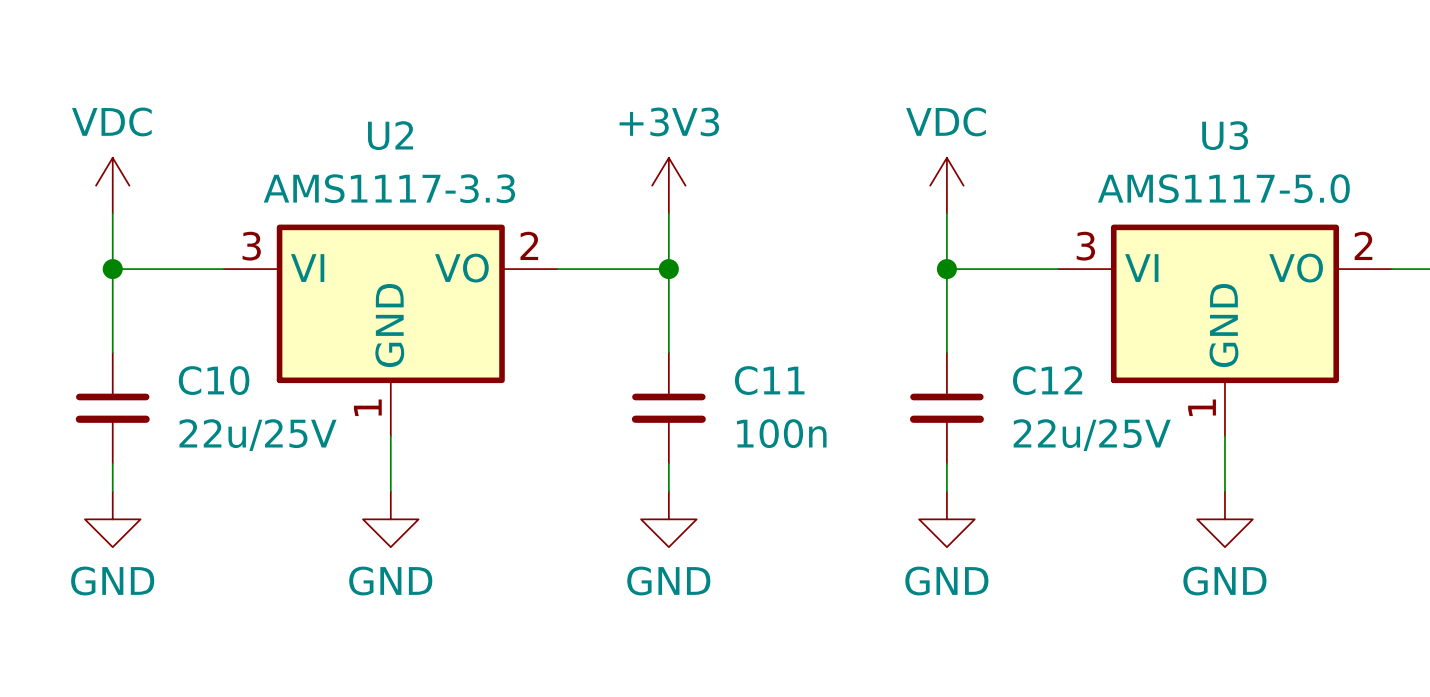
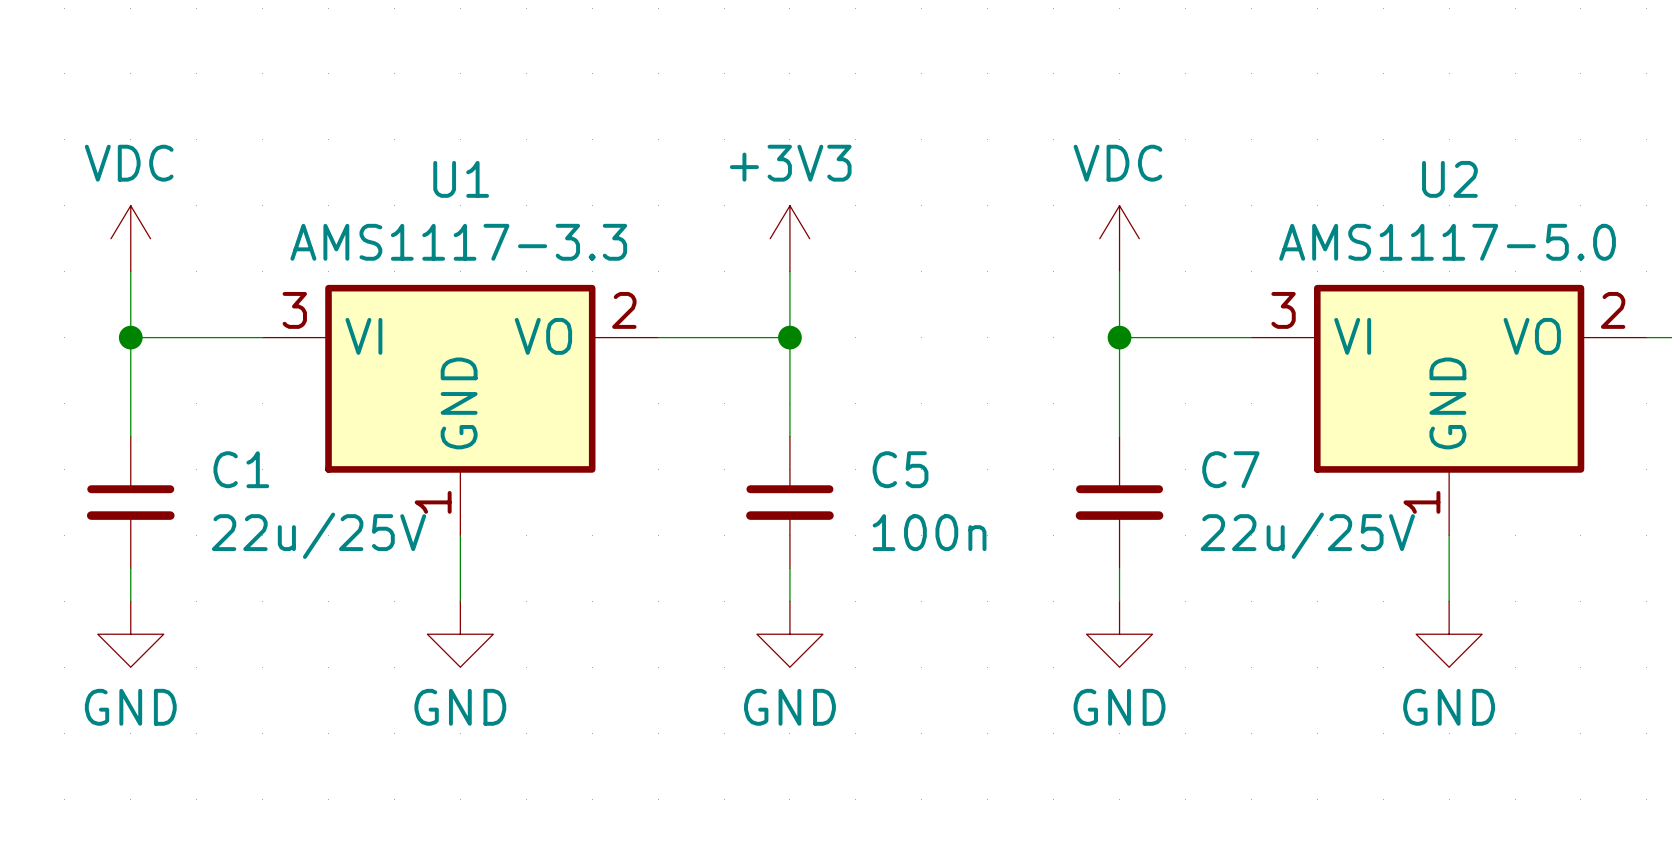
U2 name: U2 (390, 135) -> U1 (461, 179)
U3 name: U3 (1225, 135) -> U2 (1449, 179)
C10 name: C10 (214, 380) -> C1 (241, 469)
C11 name: C11 (769, 380) -> C5 (900, 469)
C12 name: C12 (1047, 380) -> C7 (1230, 469)

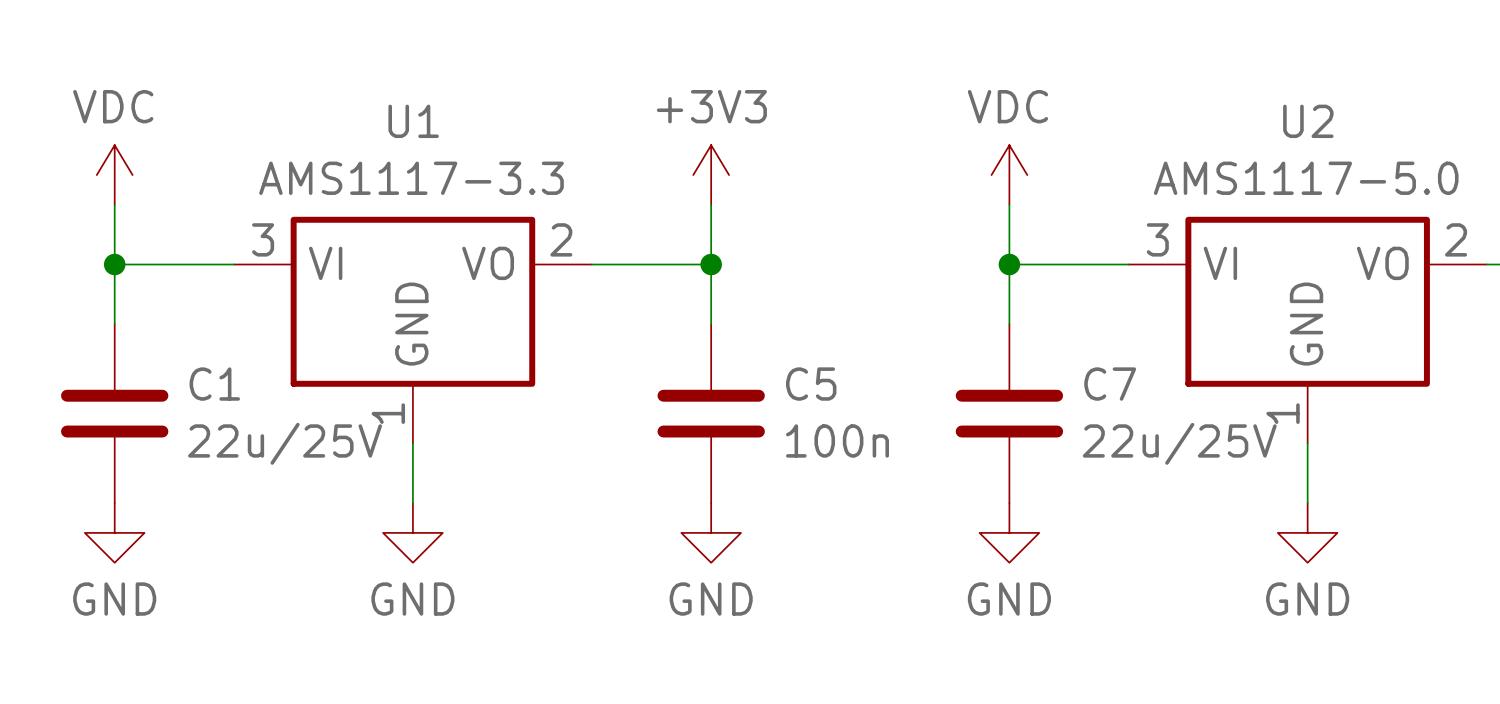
C1 symbol: [86, 436, 175, 569] -> [61, 324, 169, 504]
C5 symbol: [746, 436, 834, 569] -> [657, 324, 765, 504]
C7 symbol: [1075, 436, 1164, 569] -> [955, 324, 1064, 504]

